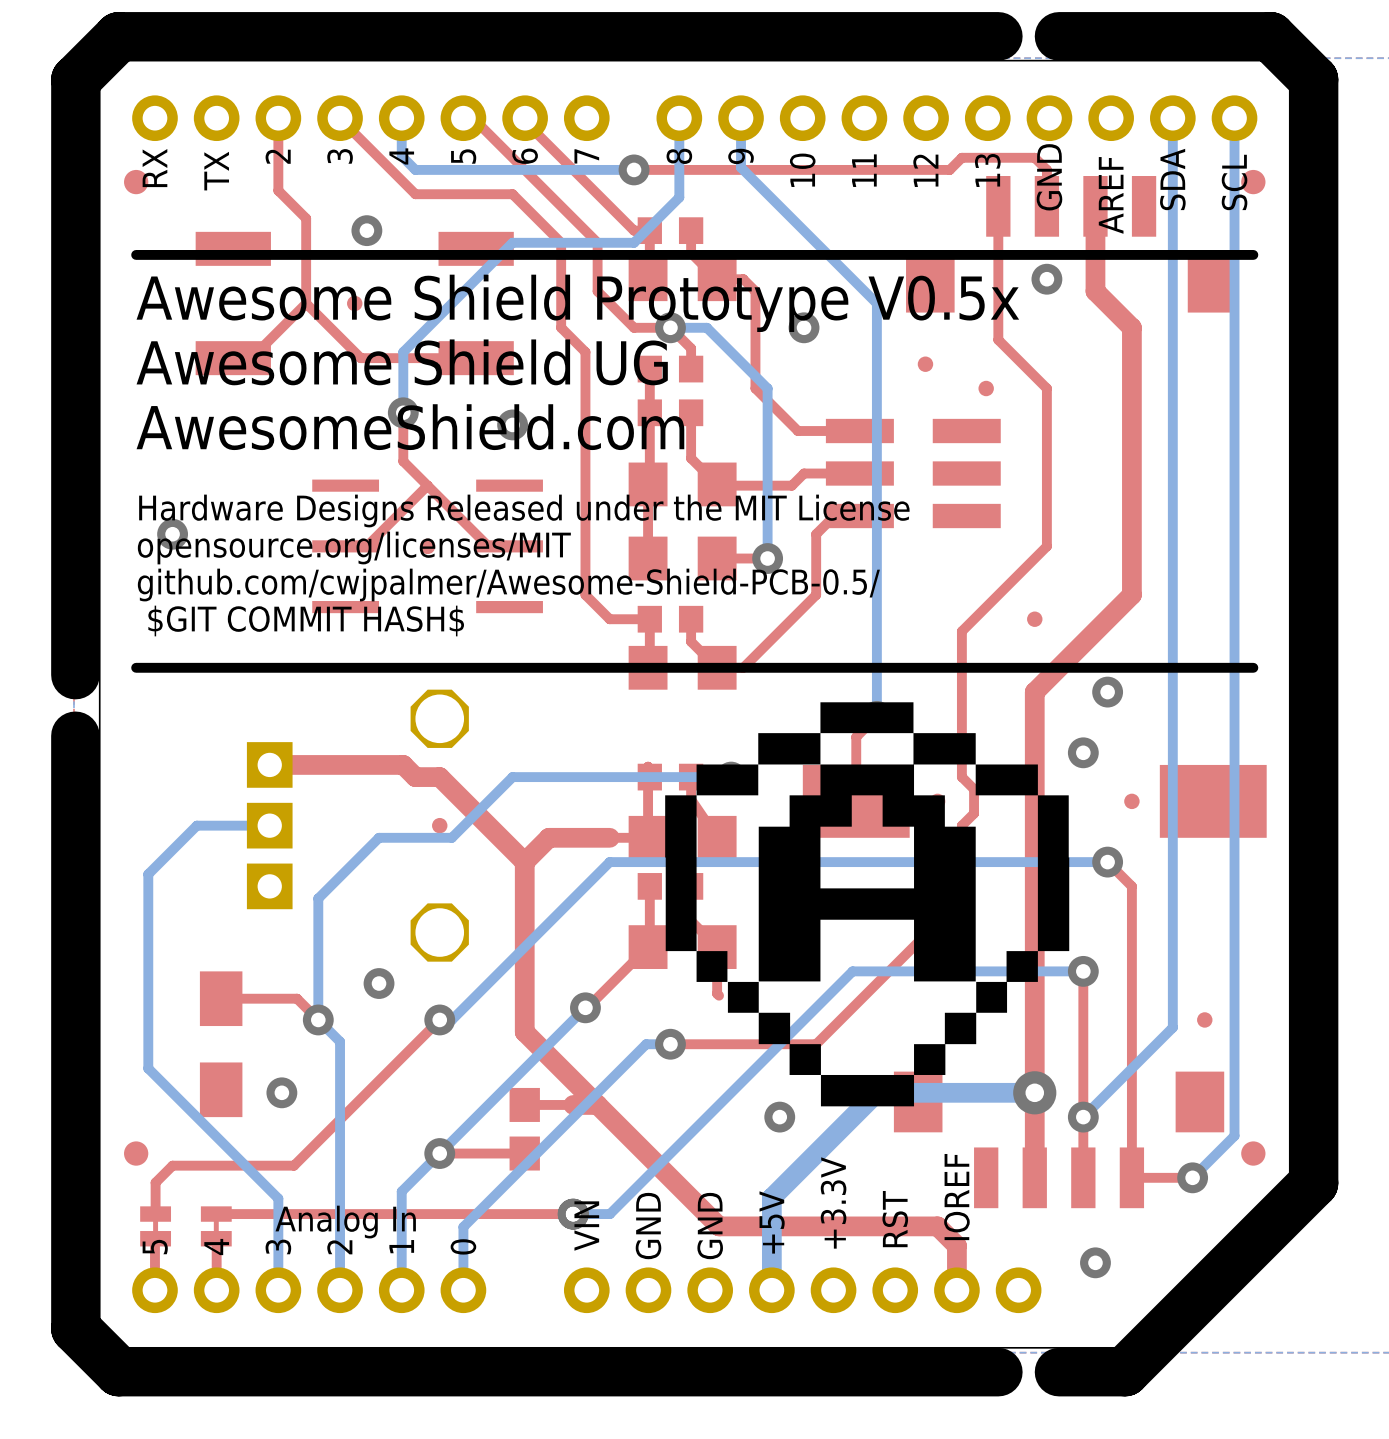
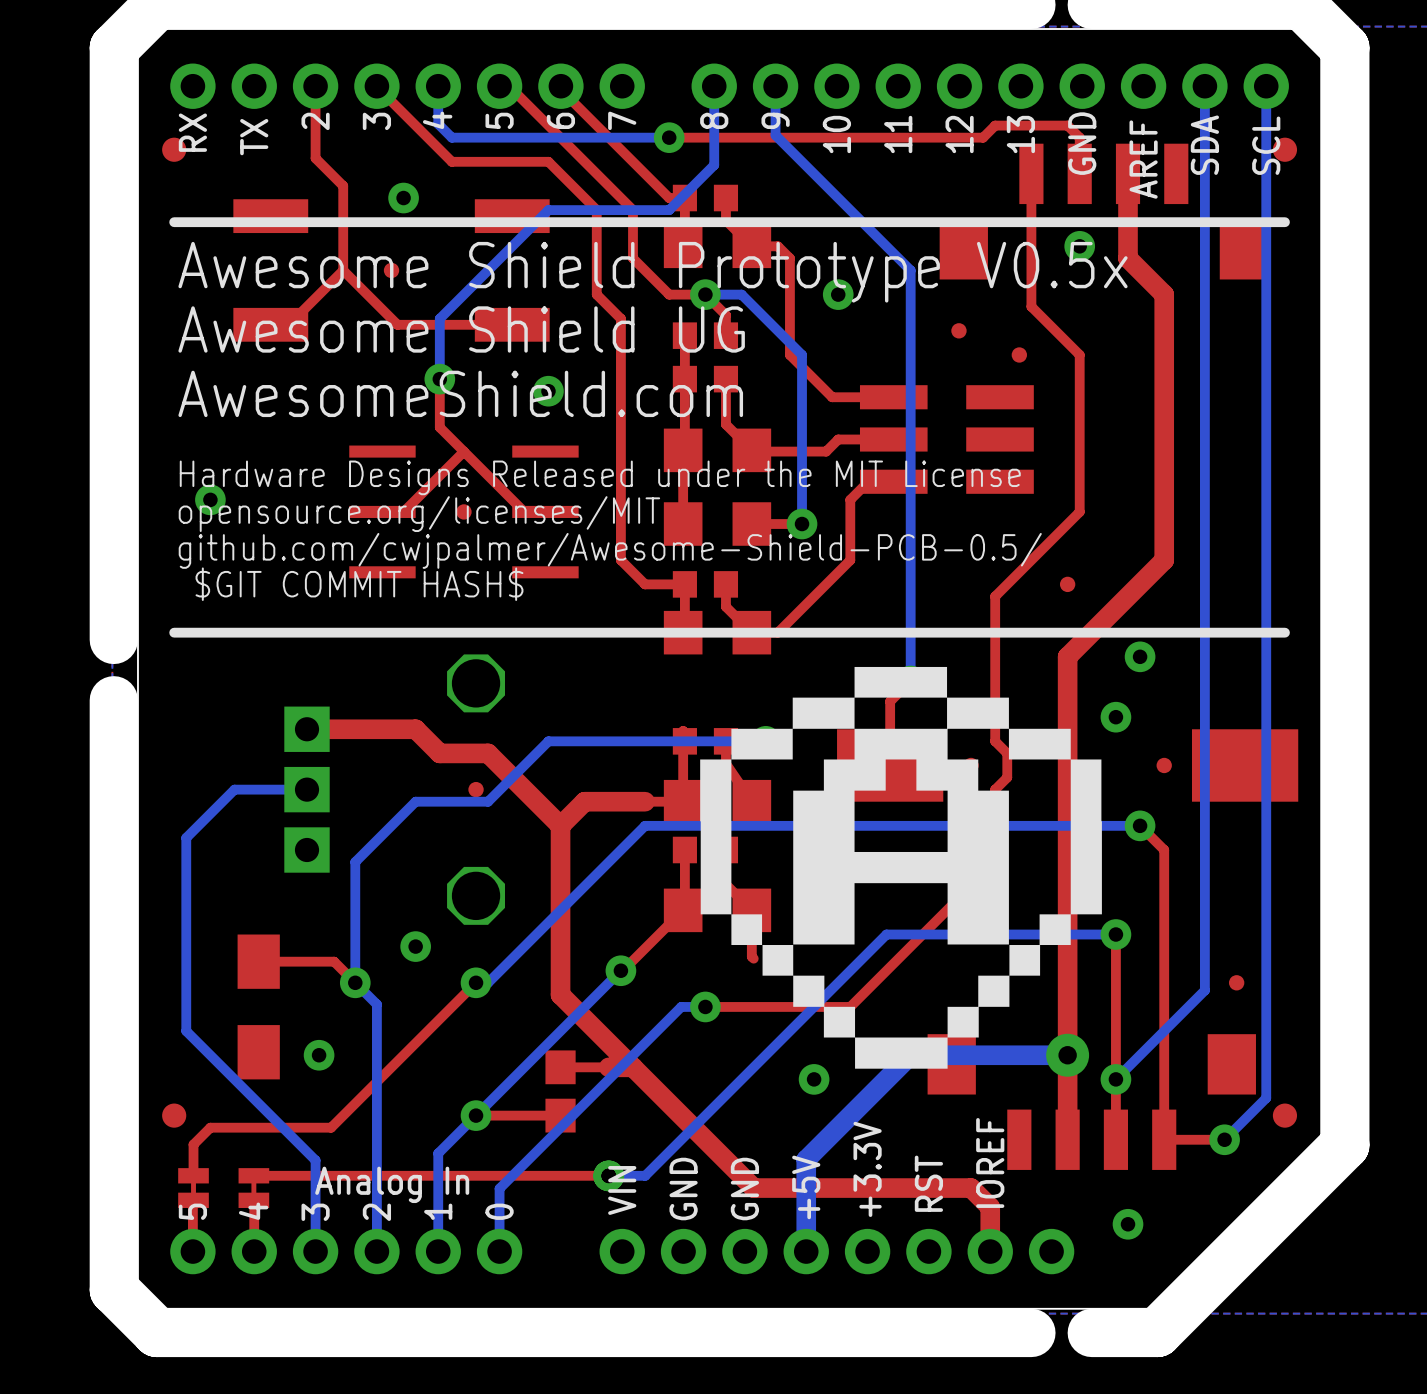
top track: (379, 764) (403, 764) (415, 777) (439, 777) (451, 789) -> (415, 729) (439, 753) (488, 753)

